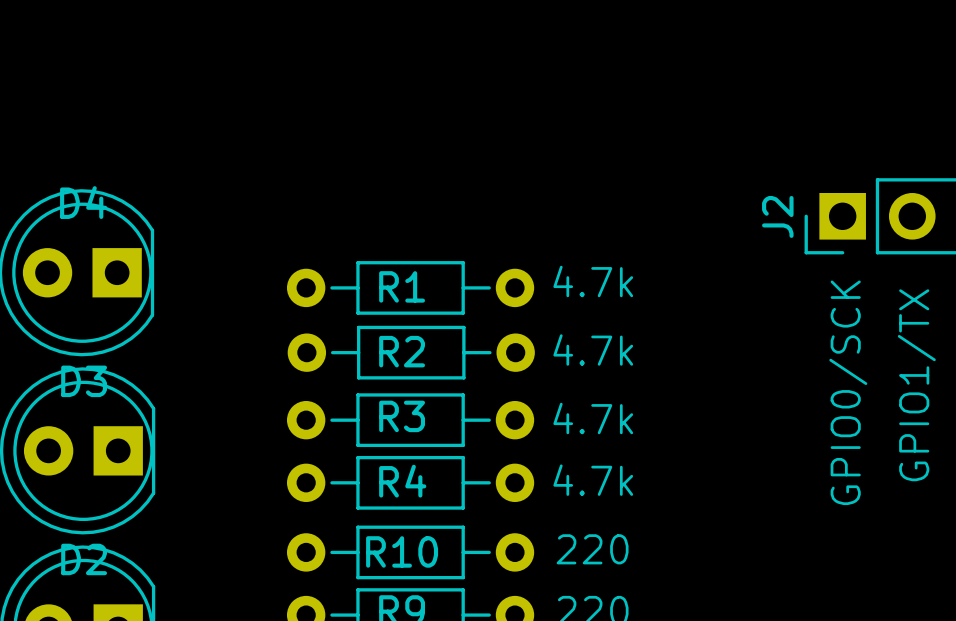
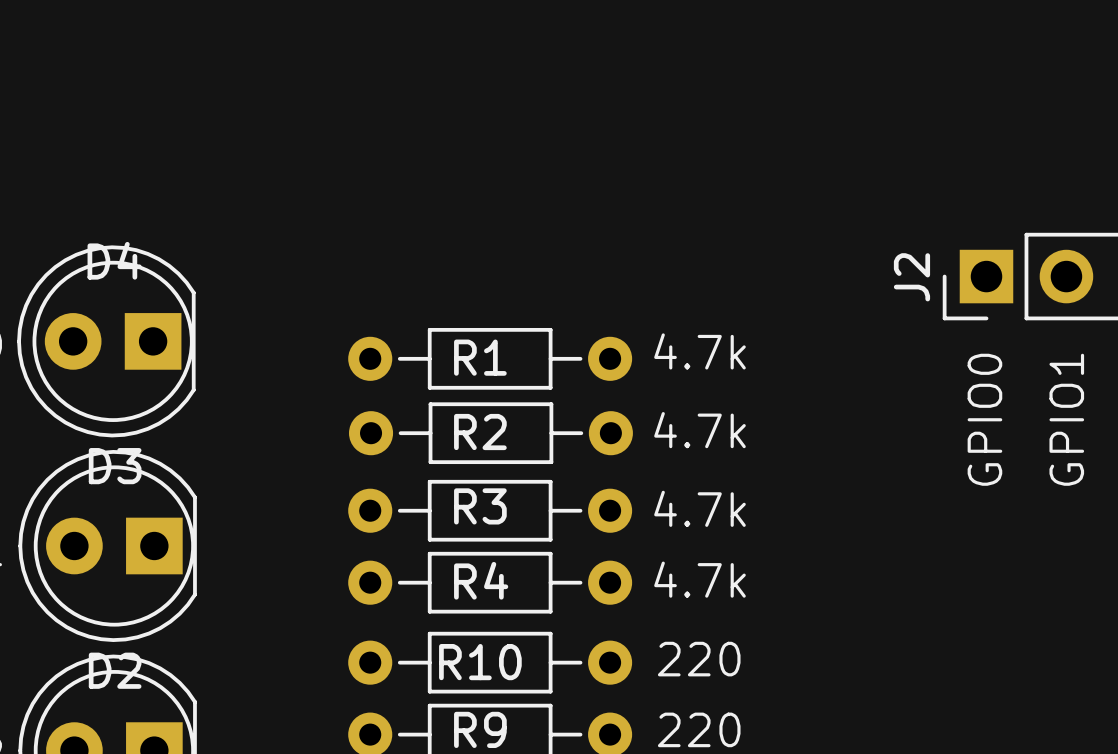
text: GPIO1/TX (916, 385) -> GPIO1 (1066, 419)
text: GPIO0/SCK (848, 392) -> GPIO0 (984, 419)

